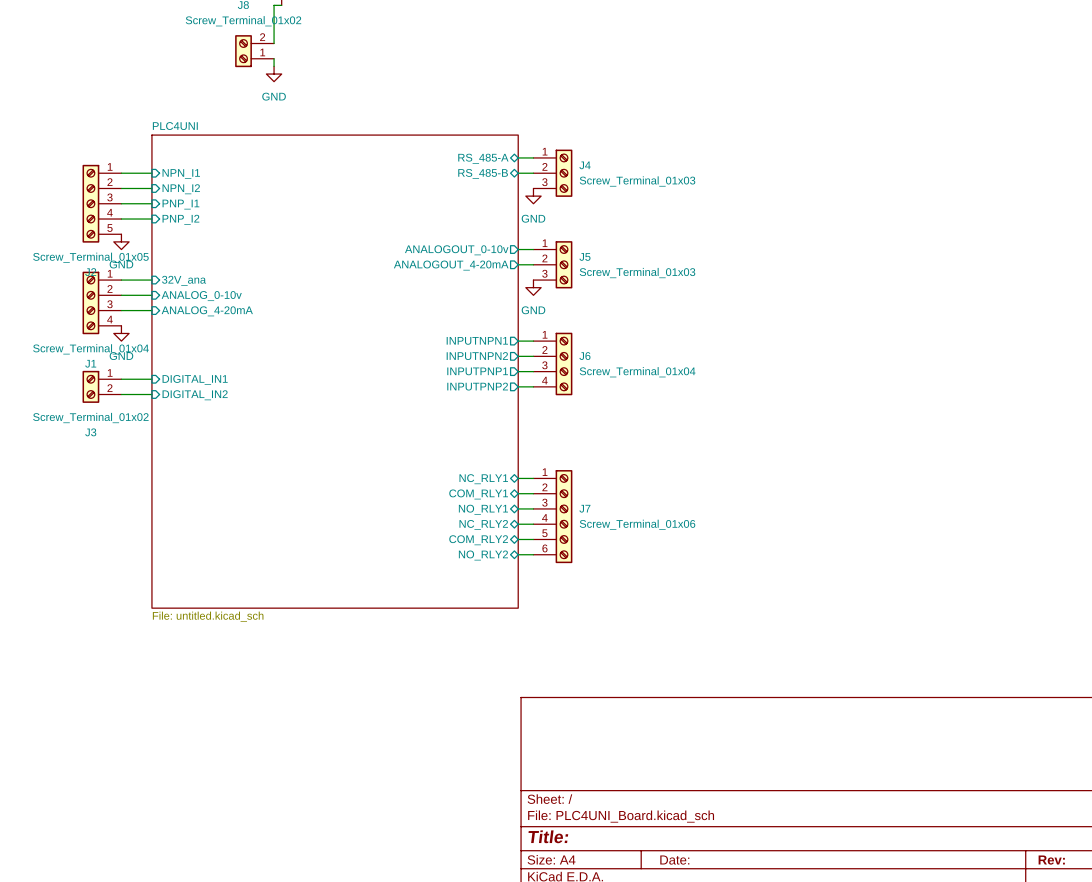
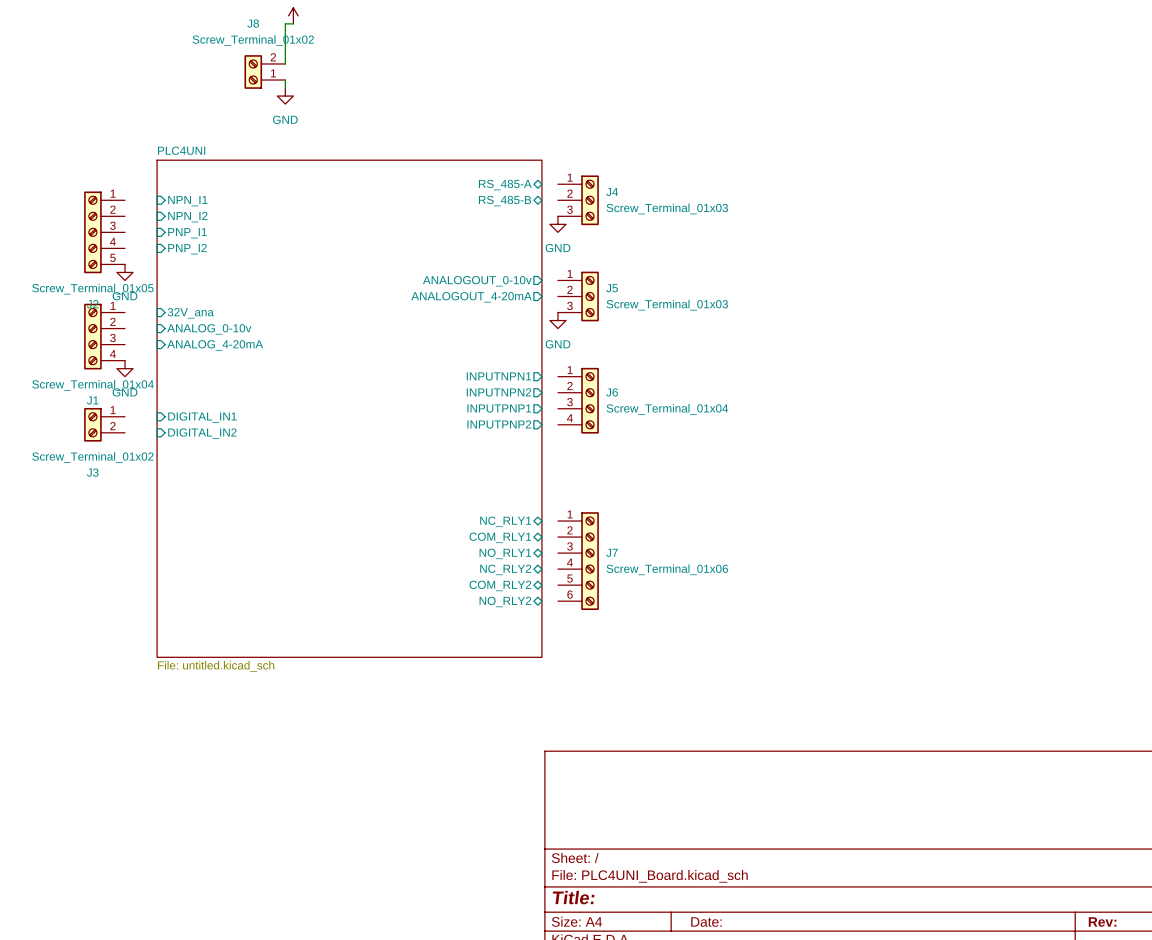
wire: (518, 157) (533, 157) -> none
wire: (121, 173) (151, 173) -> none
wire: (518, 173) (533, 173) -> none
wire: (121, 188) (151, 188) -> none
wire: (121, 203) (151, 203) -> none
wire: (121, 219) (151, 219) -> none
wire: (518, 249) (533, 249) -> none
wire: (518, 264) (533, 264) -> none
wire: (121, 280) (151, 280) -> none
wire: (121, 295) (151, 295) -> none
wire: (121, 310) (151, 310) -> none
wire: (518, 341) (533, 341) -> none
wire: (518, 356) (533, 356) -> none
wire: (518, 371) (533, 371) -> none
wire: (121, 379) (151, 379) -> none
wire: (518, 386) (533, 386) -> none
wire: (121, 394) (151, 394) -> none
wire: (518, 478) (533, 478) -> none
wire: (518, 493) (533, 493) -> none
wire: (518, 508) (533, 508) -> none
wire: (518, 524) (533, 524) -> none
wire: (518, 539) (533, 539) -> none
wire: (518, 554) (533, 554) -> none

